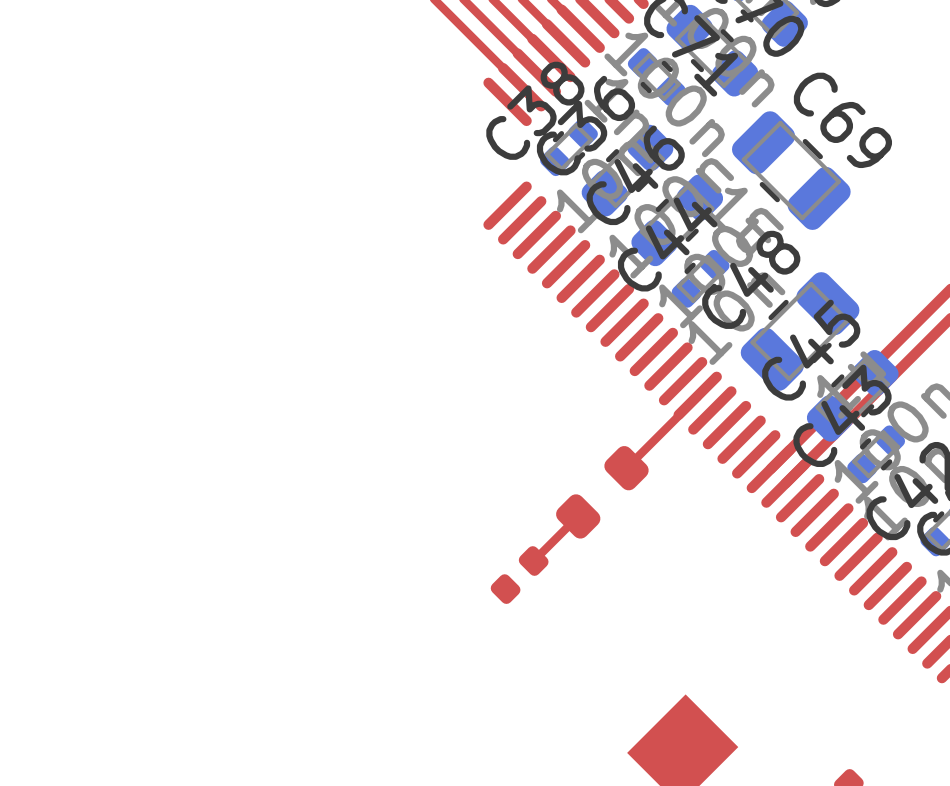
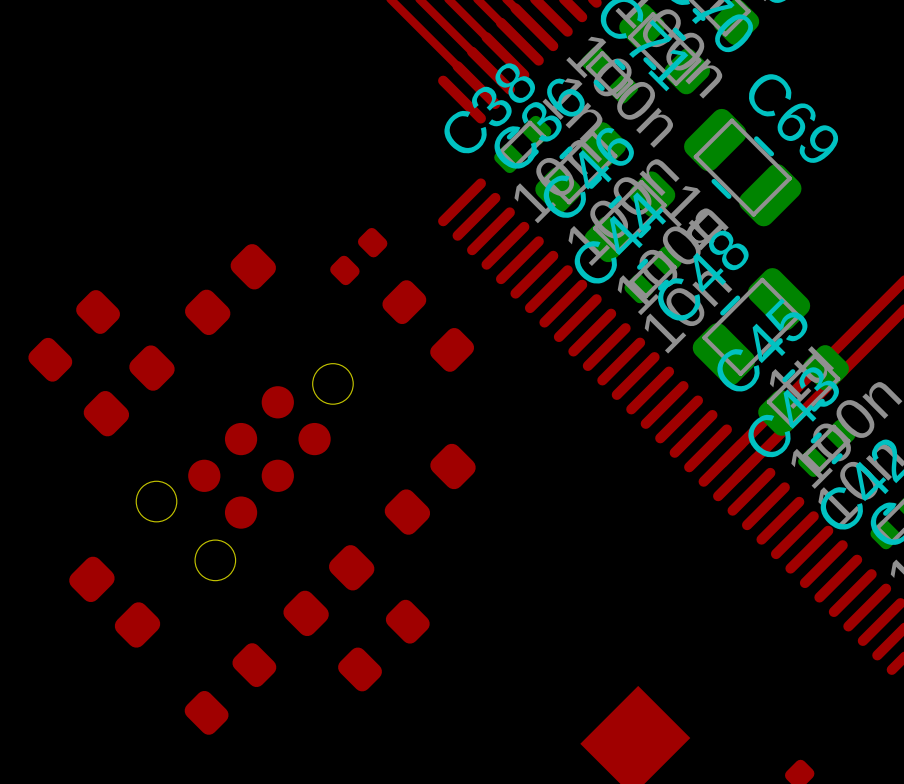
part: none -> (230, 289)
part: none -> (428, 326)
part: none -> (74, 335)
top track: (697, 395) (626, 468) -> none
part: none -> (129, 390)
part: none -> (244, 472)
part: (602, 492) -> none
part: none -> (430, 489)
top track: (578, 516) (533, 561) -> none
part position: (519, 575) -> (358, 256)
part: none -> (328, 590)
part: none -> (114, 602)
part: none -> (383, 645)
part: none -> (230, 688)

